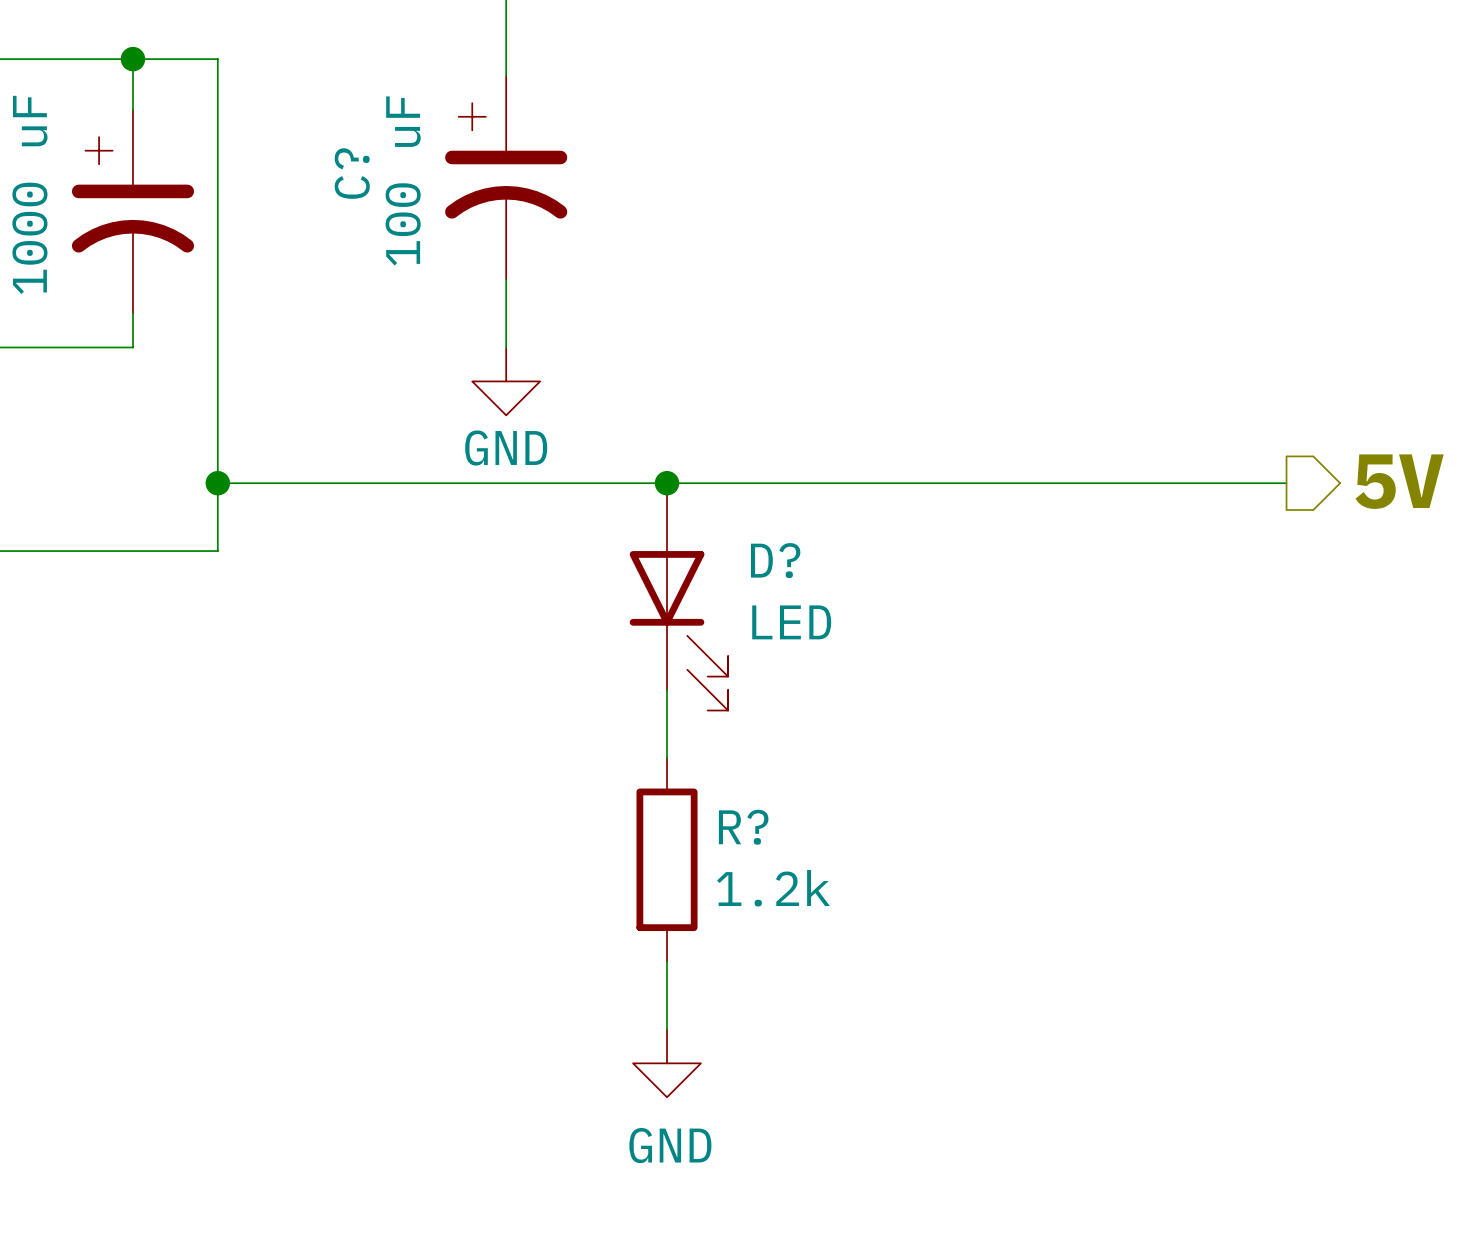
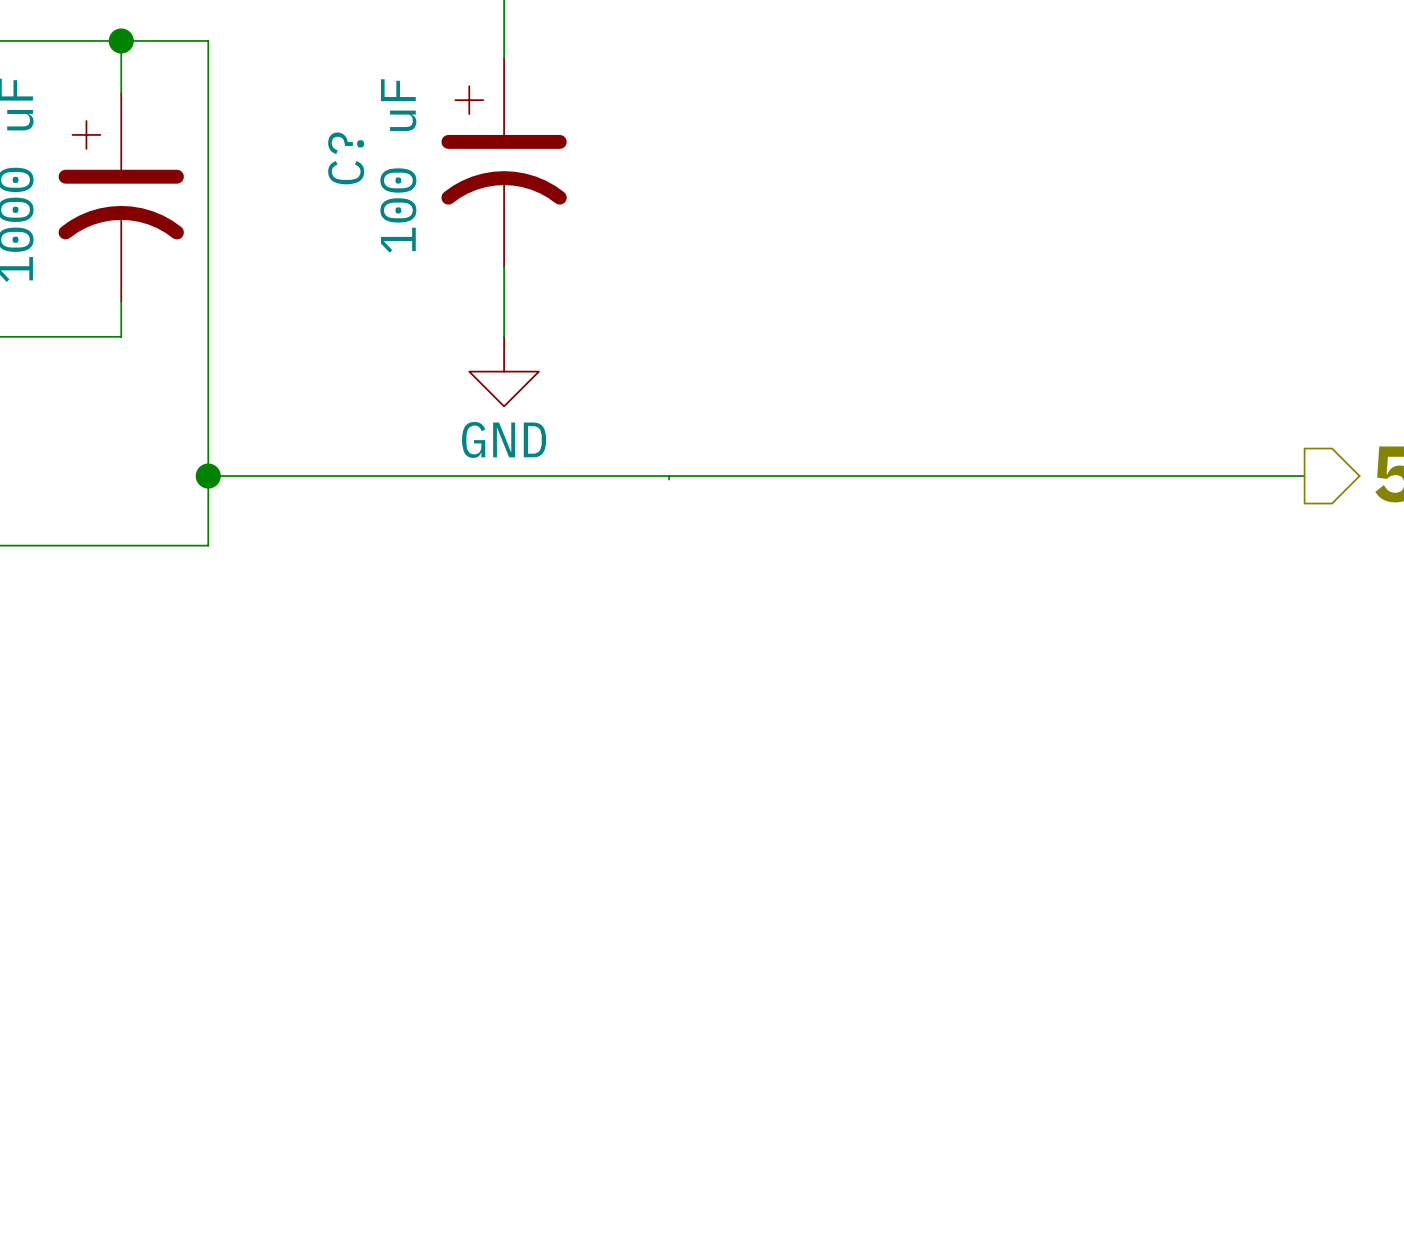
junction: (667, 483) -> none
D?: LED (678, 598) -> none
wire: (667, 690) (667, 758) -> none
R?: 1.2k (667, 859) -> none
wire: (667, 961) (667, 1029) -> none
power symbol: GND (667, 1063) -> none

